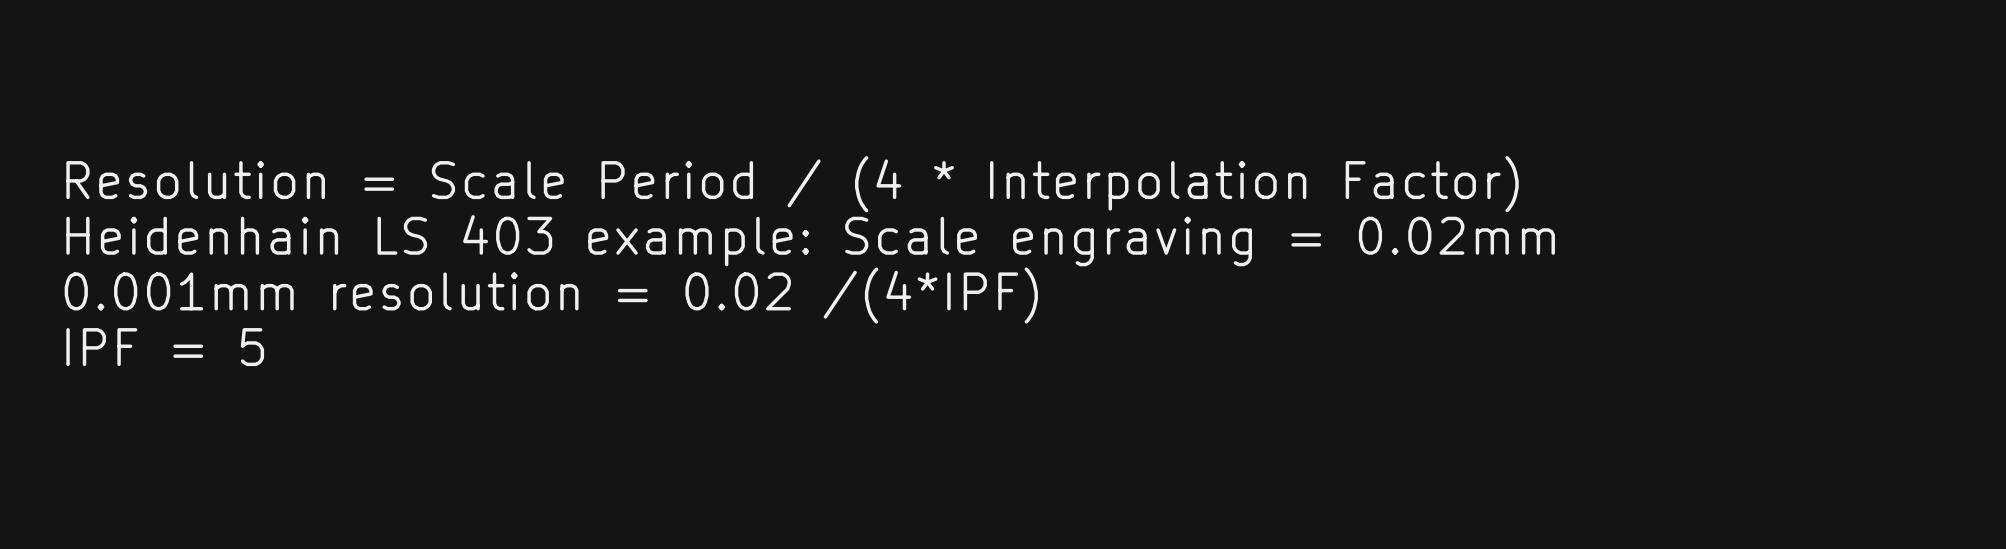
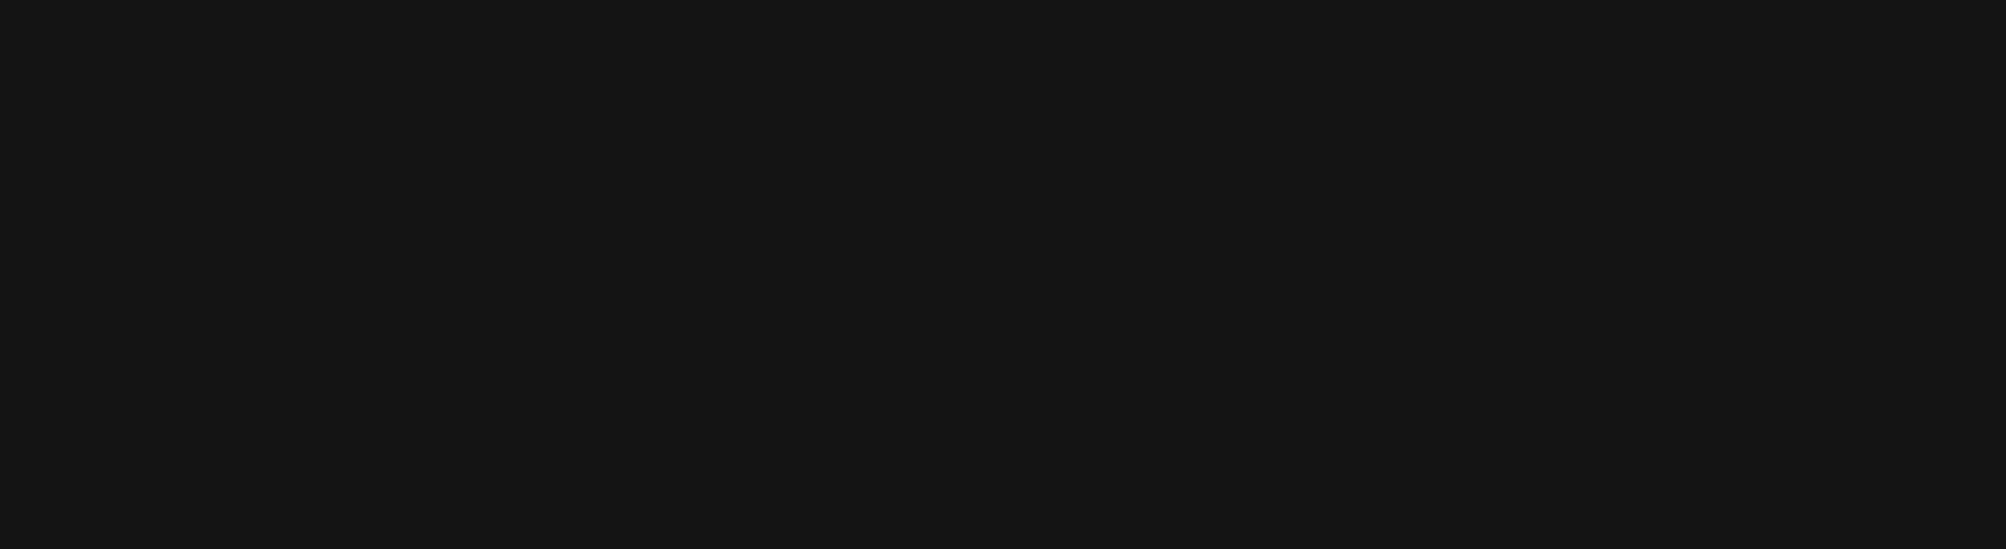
text: Resolution = Scale Period / (4 * Interpolation Factor) (792, 184) -> none
text: Heidenhain LS 403 example: Scale engraving = 0.02mm (810, 240) -> none
text: 0.001mm resolution = 0.02 /(4*IPF) (551, 295) -> none
text: IPF = 5 (165, 347) -> none

